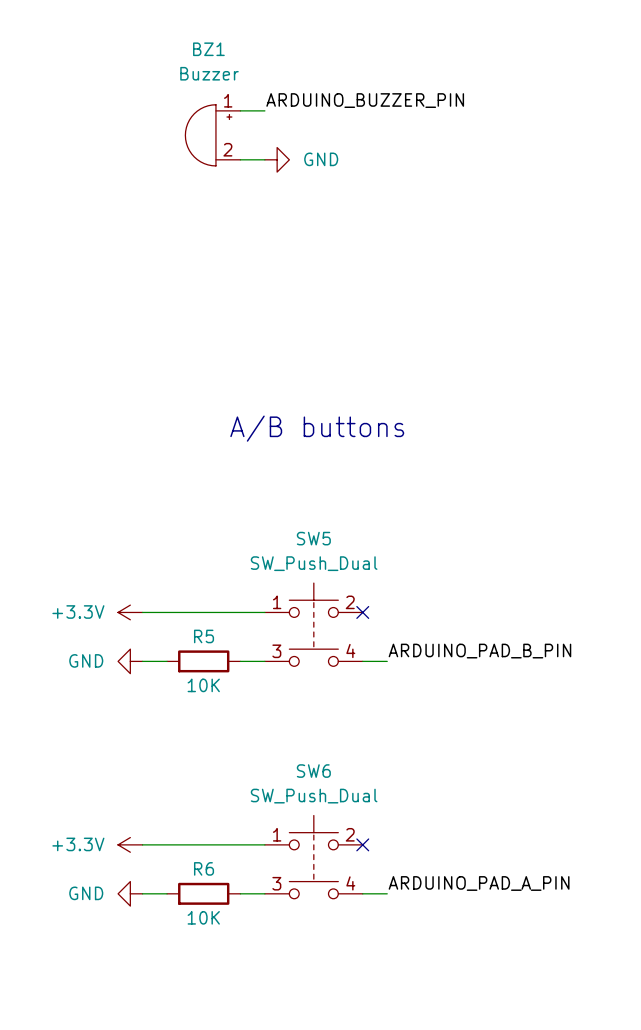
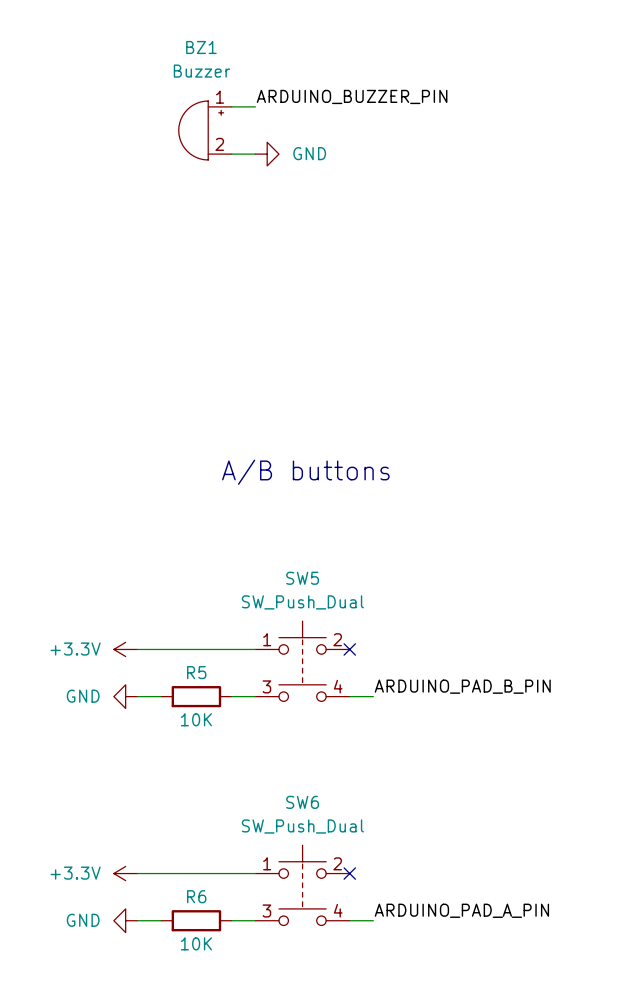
text position: A/B buttons (317, 428) -> A/B buttons (305, 472)
power symbol position: +3.3V (130, 612) -> +3.3V (125, 649)
wire: (142, 612) (264, 612) -> (137, 649) (255, 649)
no-connect mark: (362, 612) -> none
SW5 position: (313, 624) -> (302, 661)
label position: ARDUINO_PAD_B_PIN (479, 651) -> ARDUINO_PAD_B_PIN (462, 686)
power symbol position: GND (130, 661) -> GND (125, 696)
wire: (142, 661) (167, 661) -> (137, 696) (161, 696)
R5 position: (203, 661) -> (196, 696)
wire: (240, 661) (264, 661) -> (231, 696) (255, 696)
wire: (362, 661) (387, 661) -> (349, 696) (373, 696)
no-connect mark: none -> (349, 649)
power symbol position: +3.3V (130, 844) -> +3.3V (125, 873)
wire: (142, 844) (264, 844) -> (137, 873) (255, 873)
no-connect mark: (362, 844) -> none
SW6 position: (313, 857) -> (302, 885)
label position: ARDUINO_PAD_A_PIN (479, 883) -> ARDUINO_PAD_A_PIN (461, 910)
power symbol position: GND (130, 893) -> GND (125, 920)
wire: (142, 893) (167, 893) -> (137, 920) (161, 920)
R6 position: (203, 893) -> (196, 920)
wire: (240, 893) (264, 893) -> (231, 920) (255, 920)
wire: (362, 893) (387, 893) -> (349, 920) (373, 920)
no-connect mark: none -> (349, 873)

